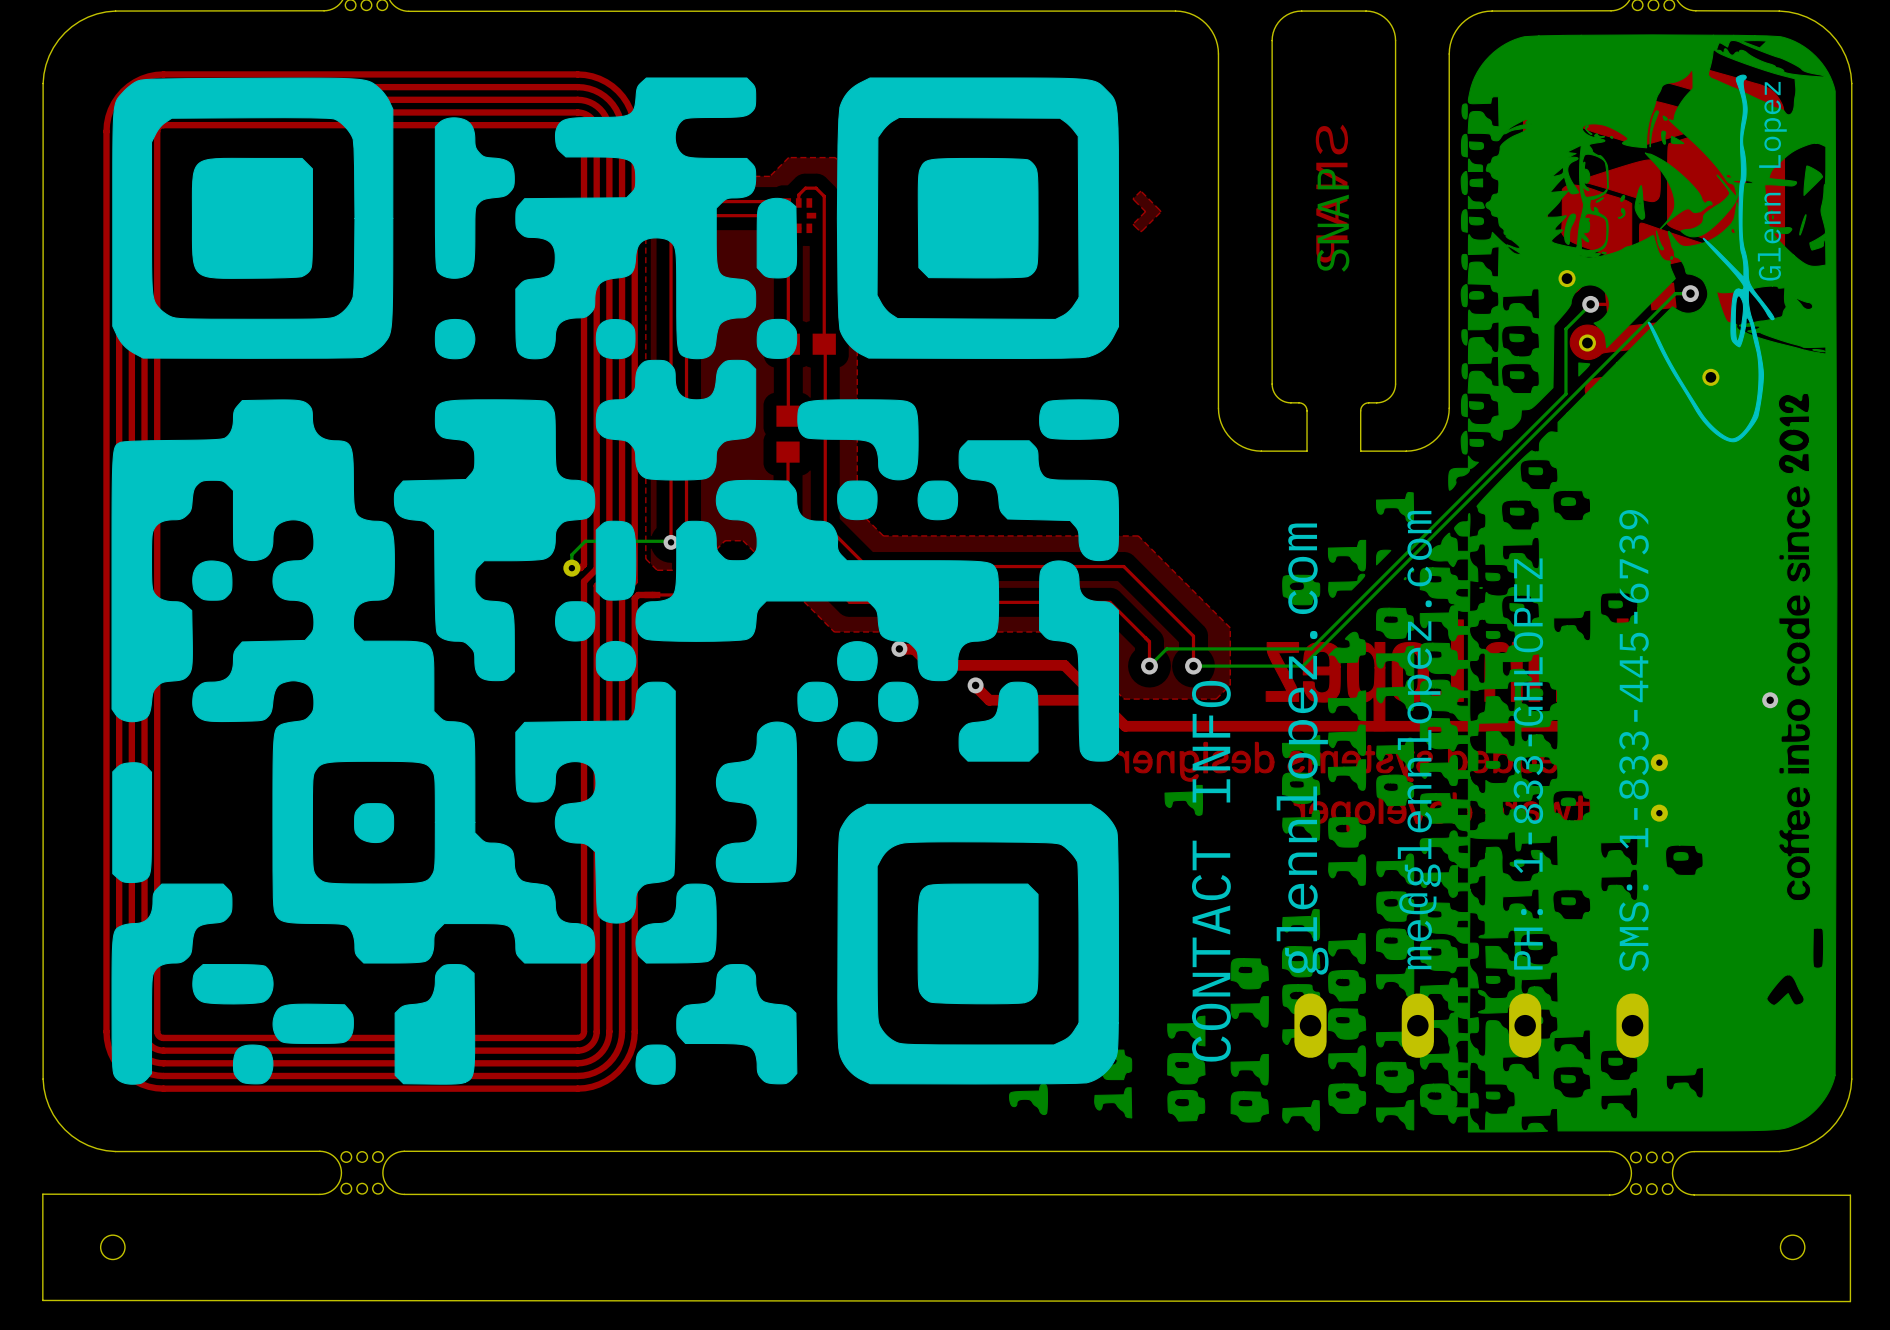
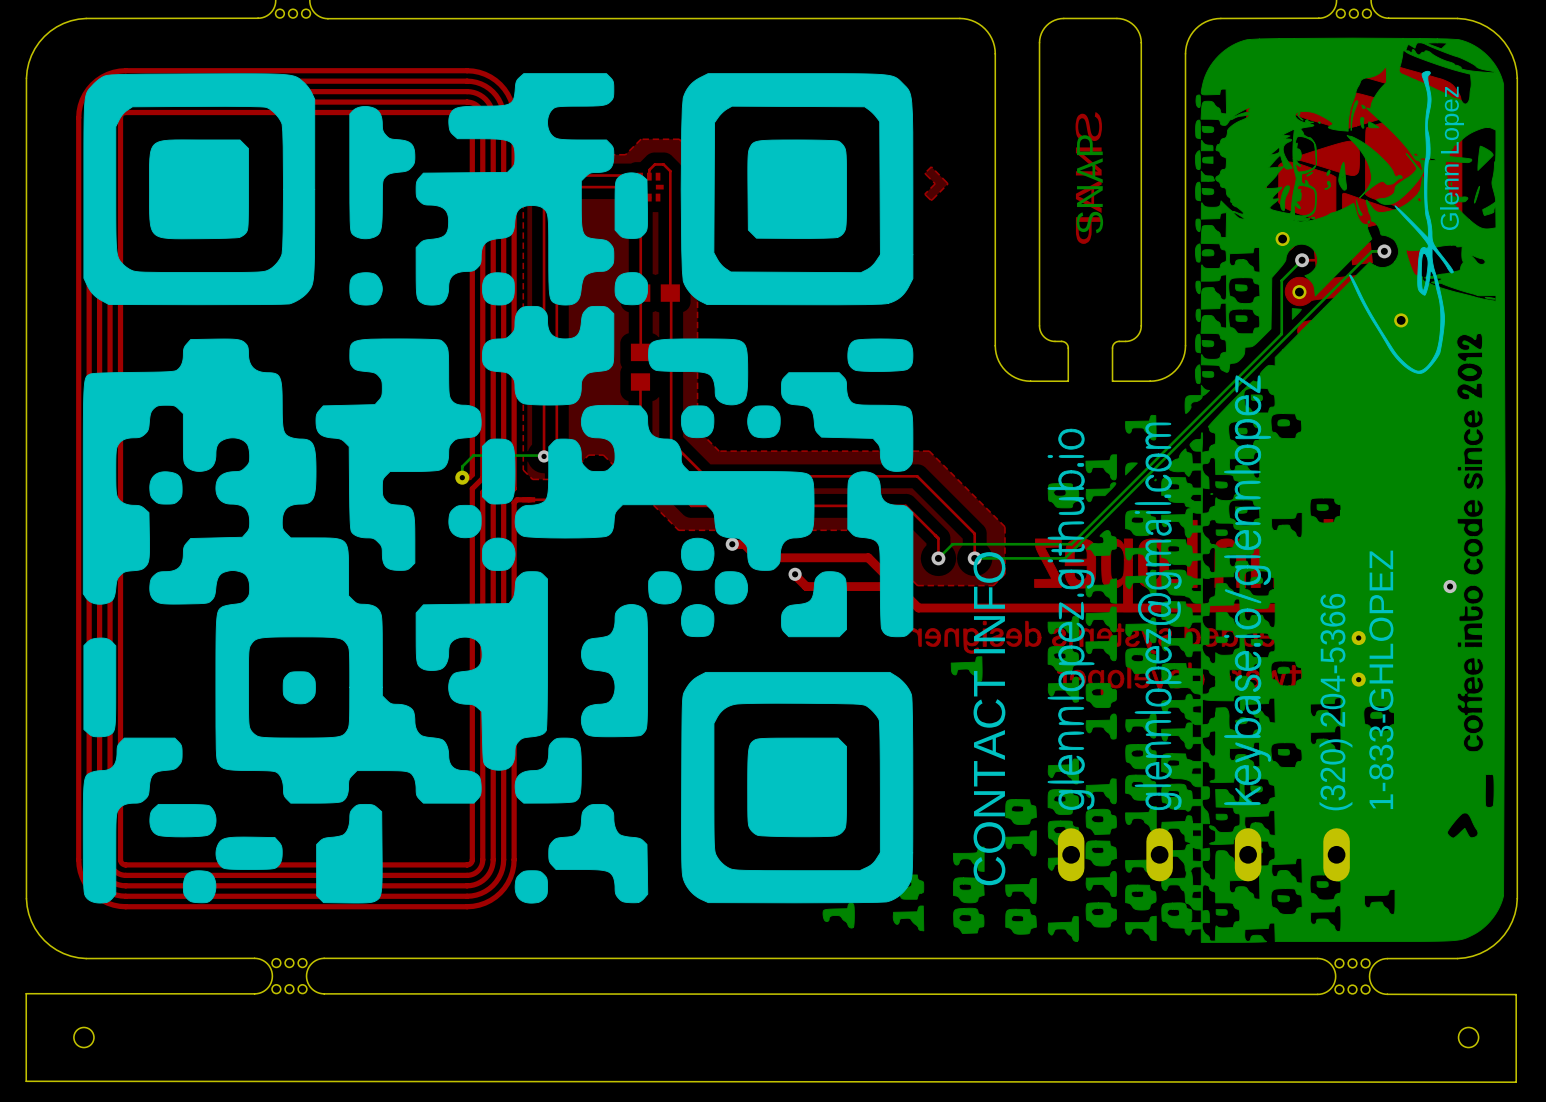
drawing: none -> [1224, 375, 1272, 806]
drawing: none -> [1134, 422, 1182, 811]
drawing: none -> [1047, 428, 1095, 810]
text: me@glennlopez.com (1419, 740) -> none
text: SMS: 1-833-445-6739 (1634, 740) -> none
text: glennlopez.com (1302, 749) -> none
text: PH: 1-833-GHLOPEZ (1528, 764) -> none
CONTACT INFO text: none -> (320) 204-5366 (1335, 702)
text: none -> 1-833-GHLOPEZ (1381, 679)

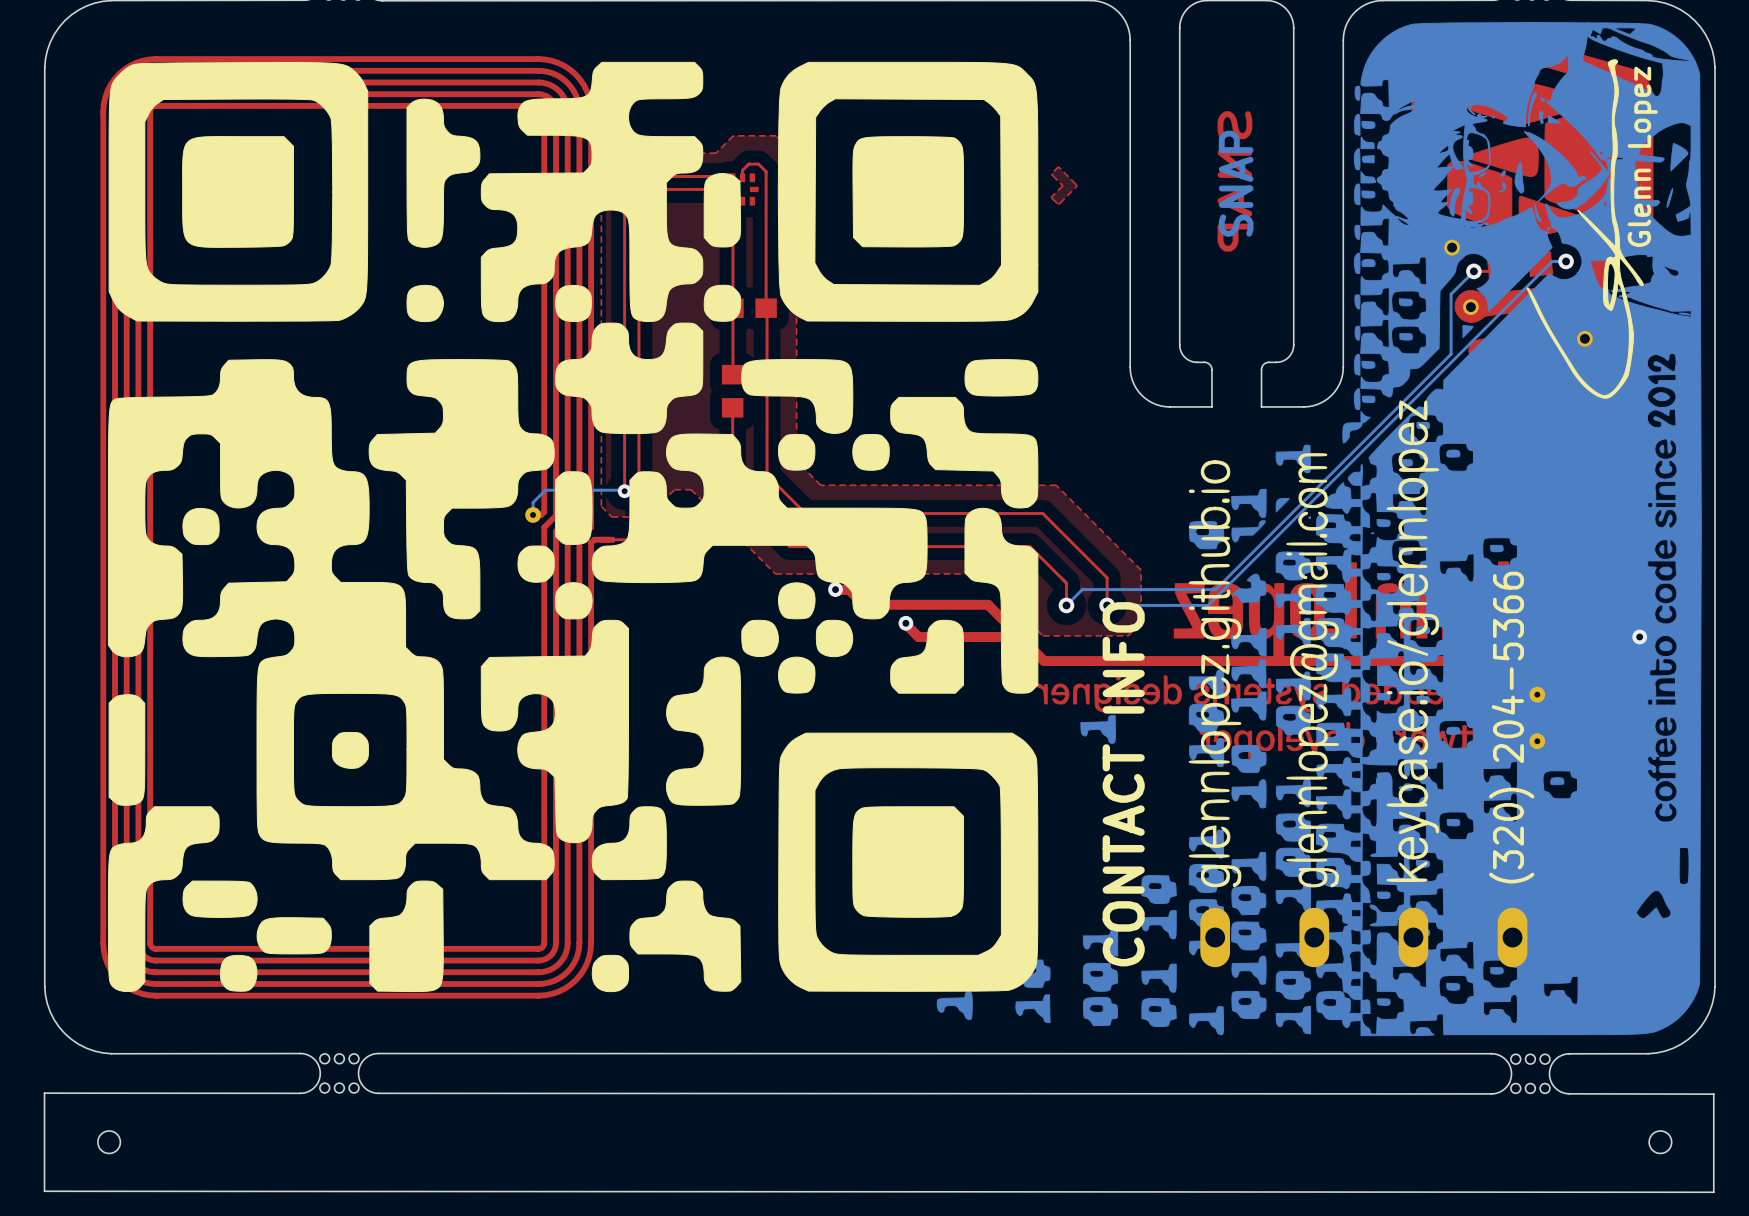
text: 1-833-GHLOPEZ (1381, 679) -> none

